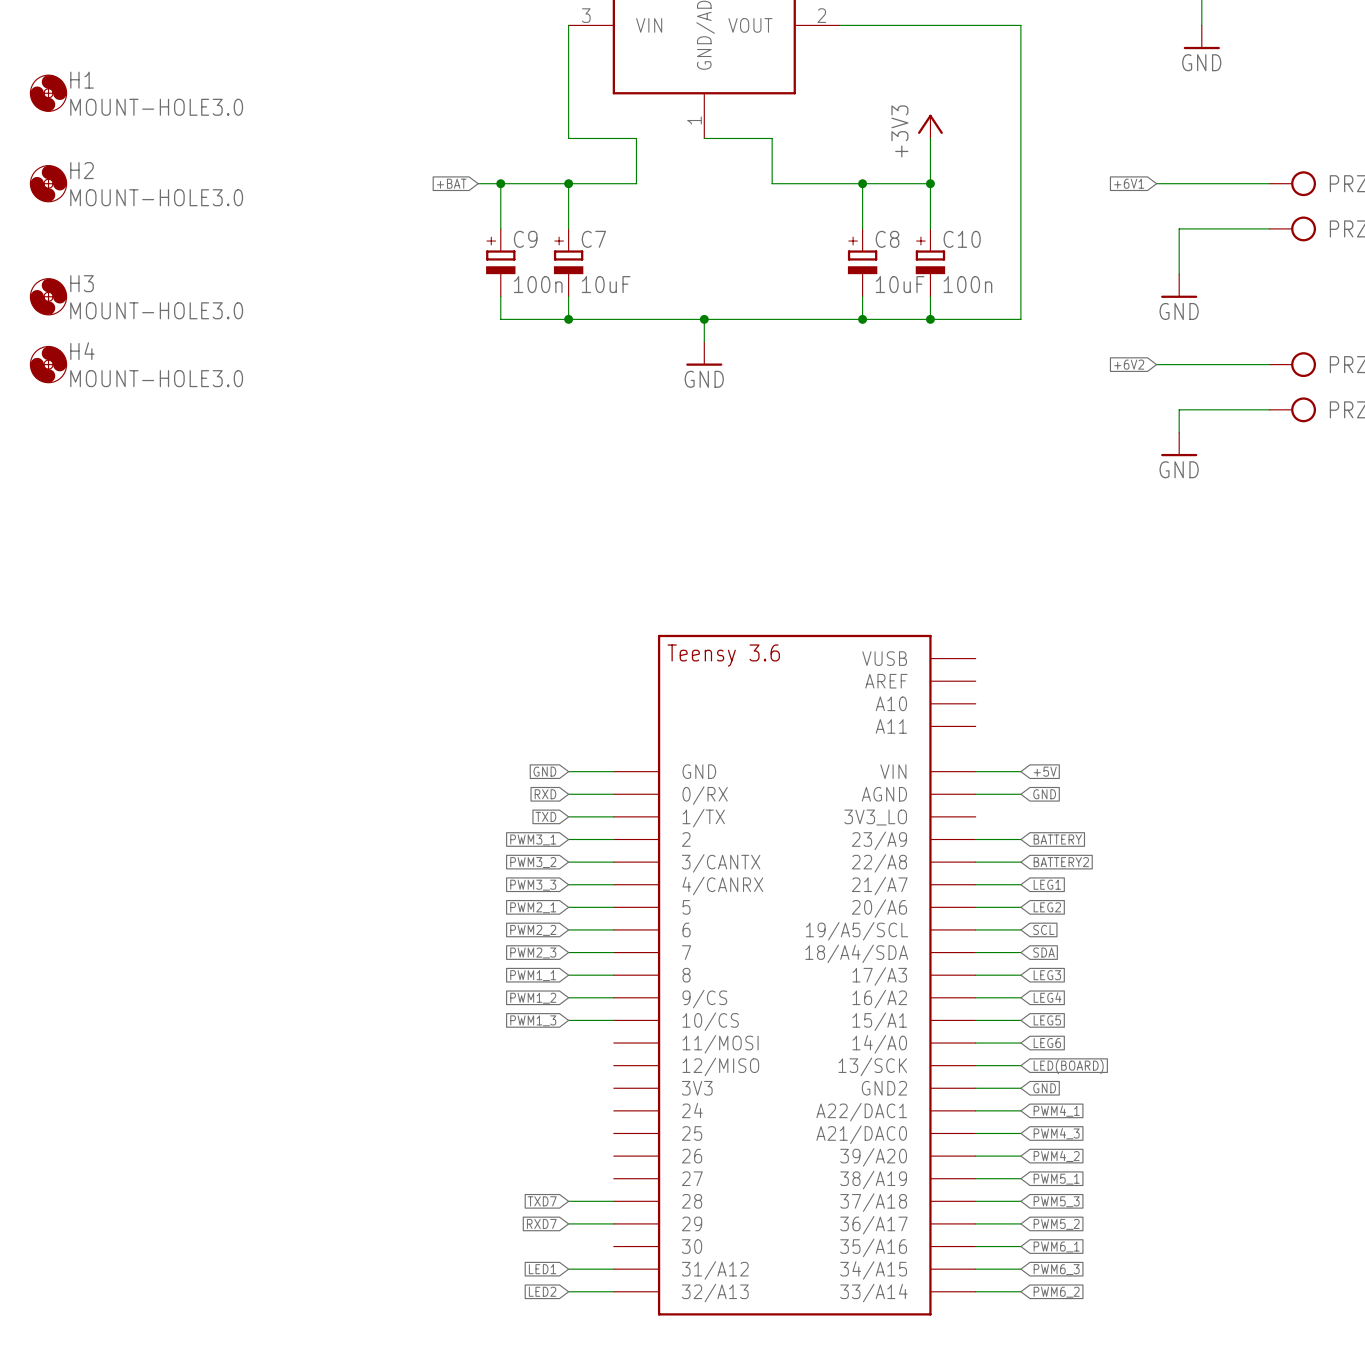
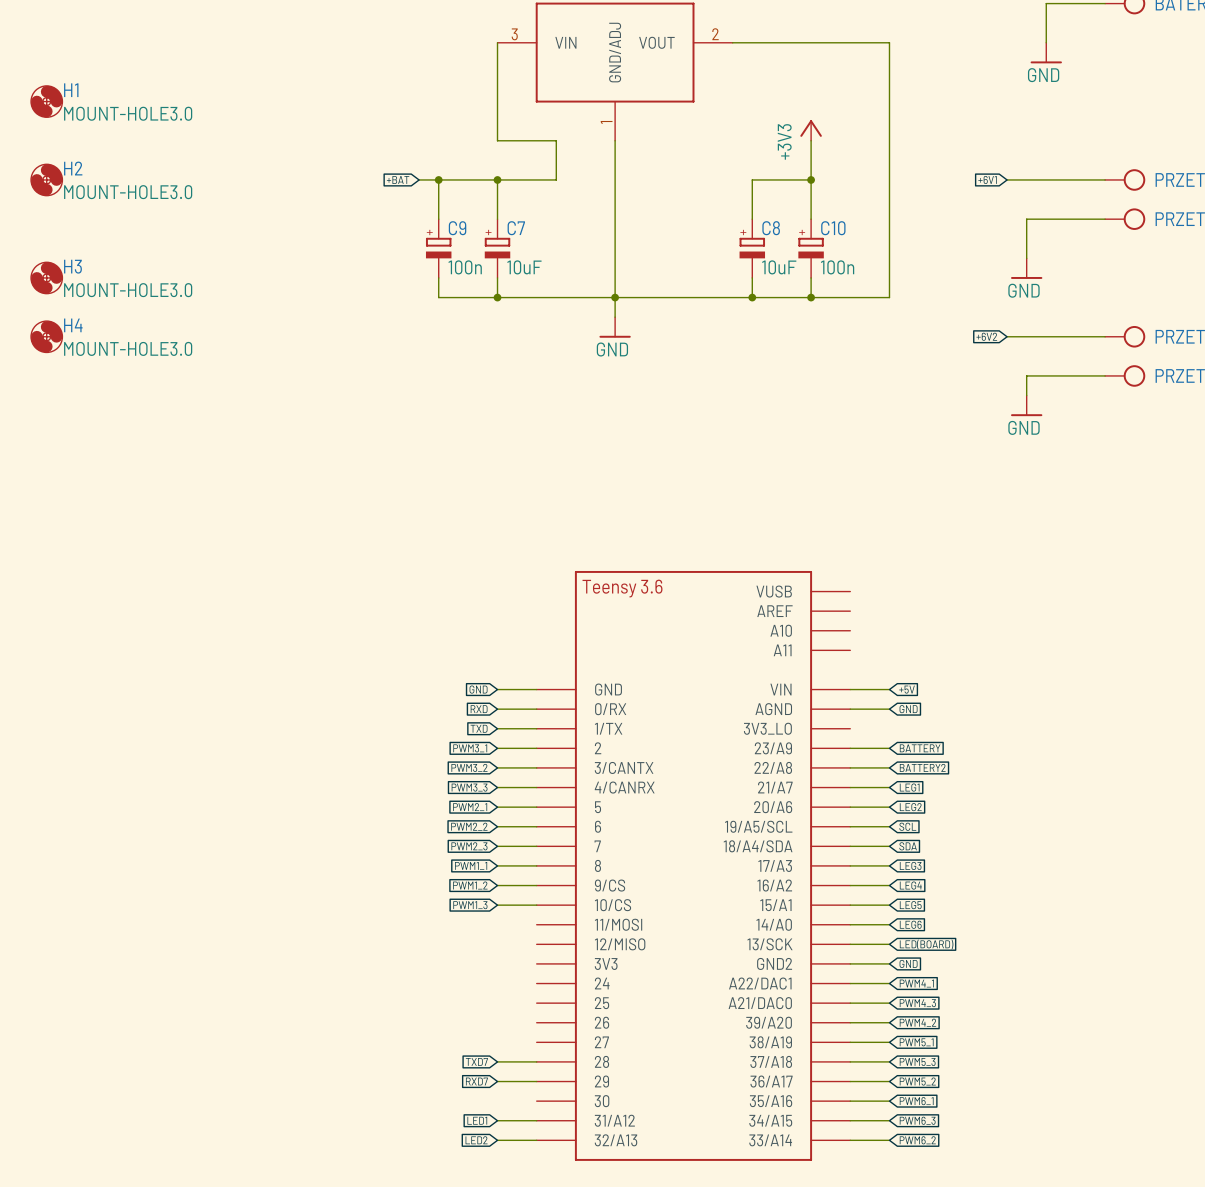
wire: (704, 138) (772, 138) (772, 183) (862, 183) -> (615, 140) (615, 297)
junction: (862, 183) -> none

